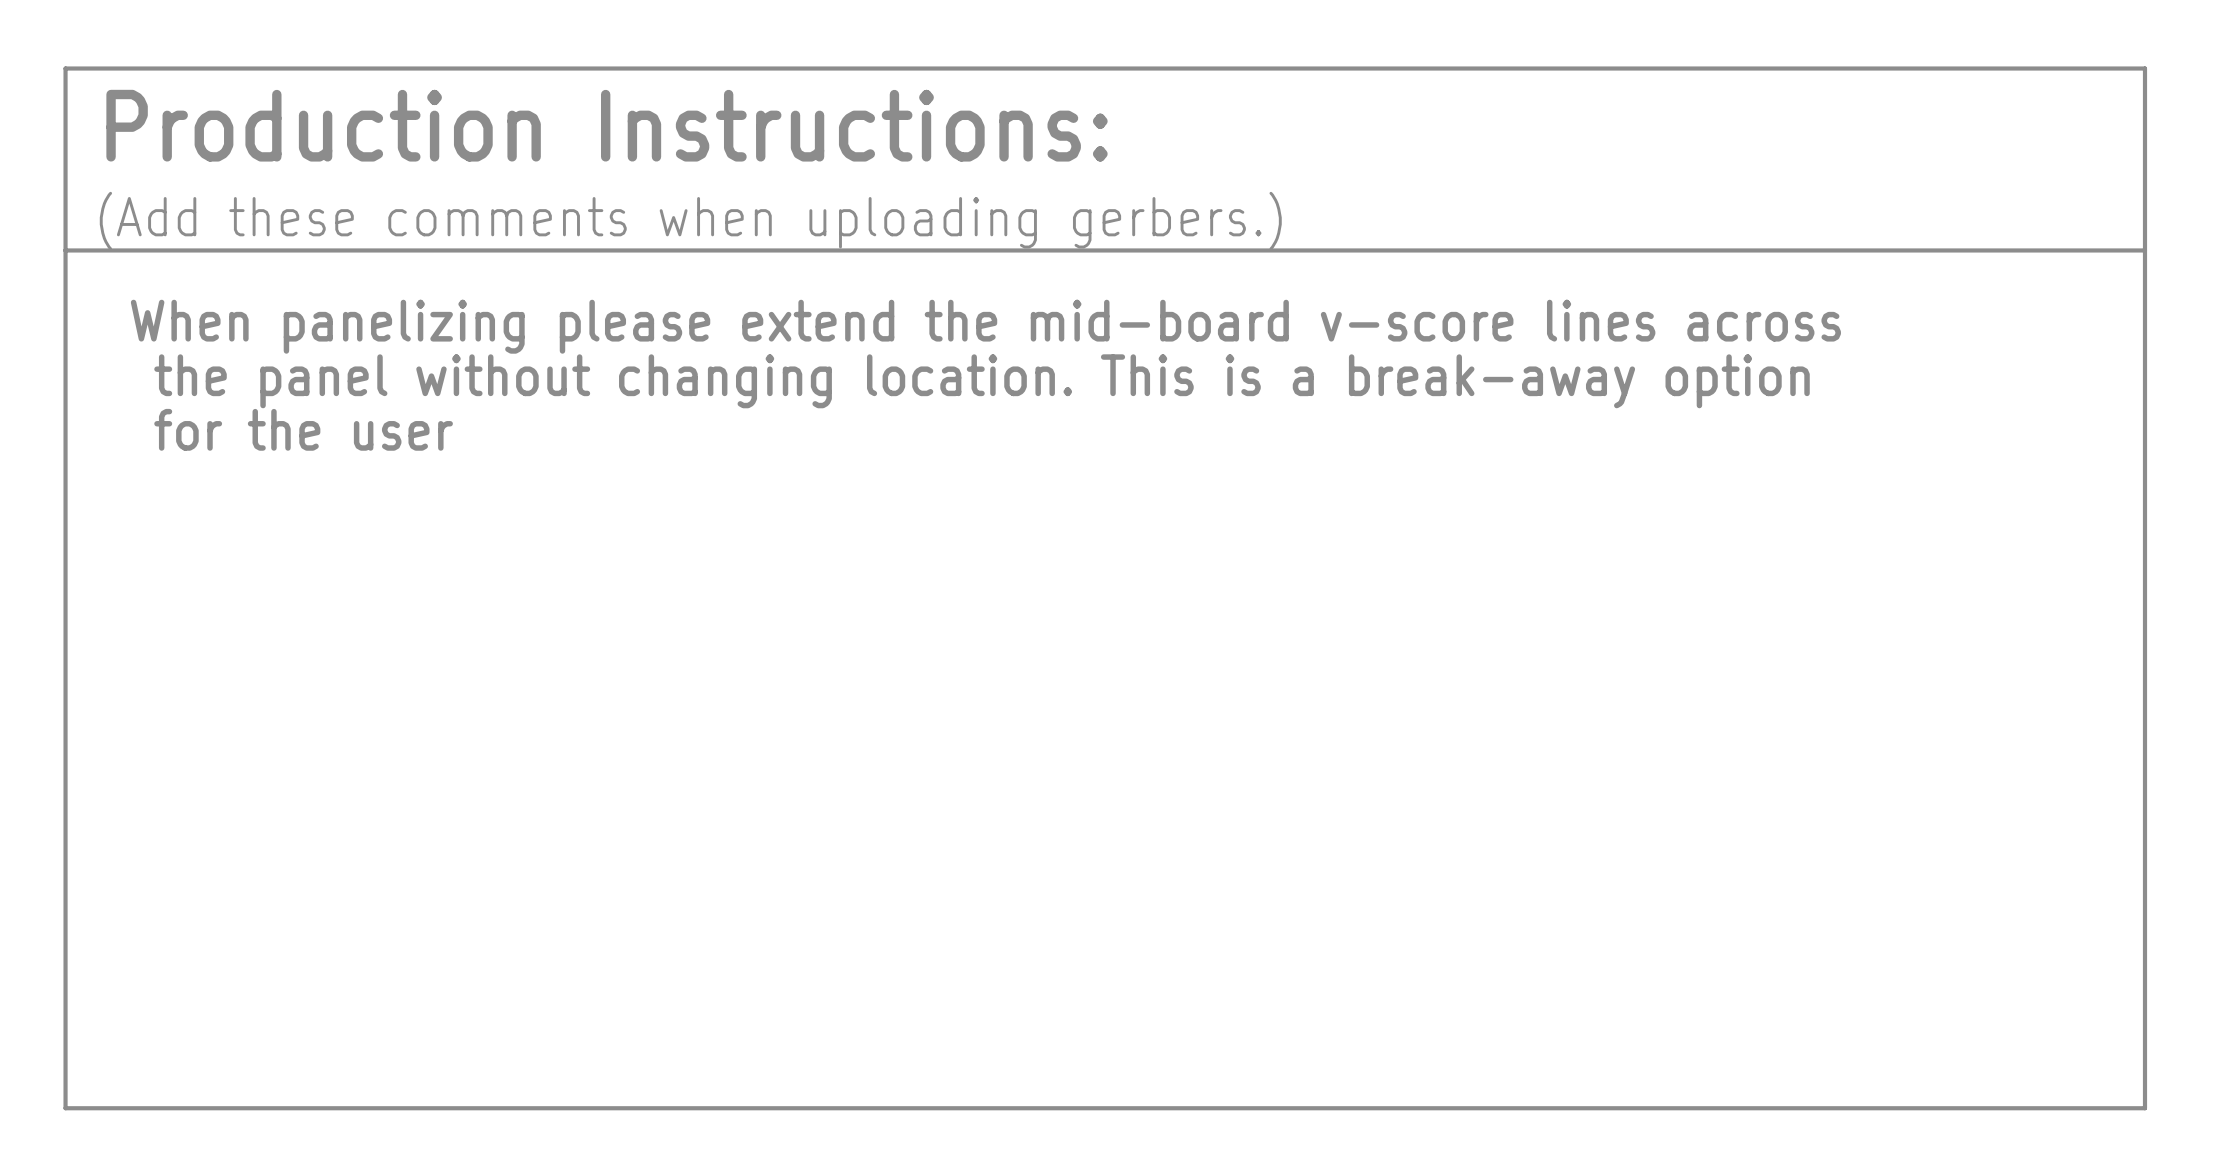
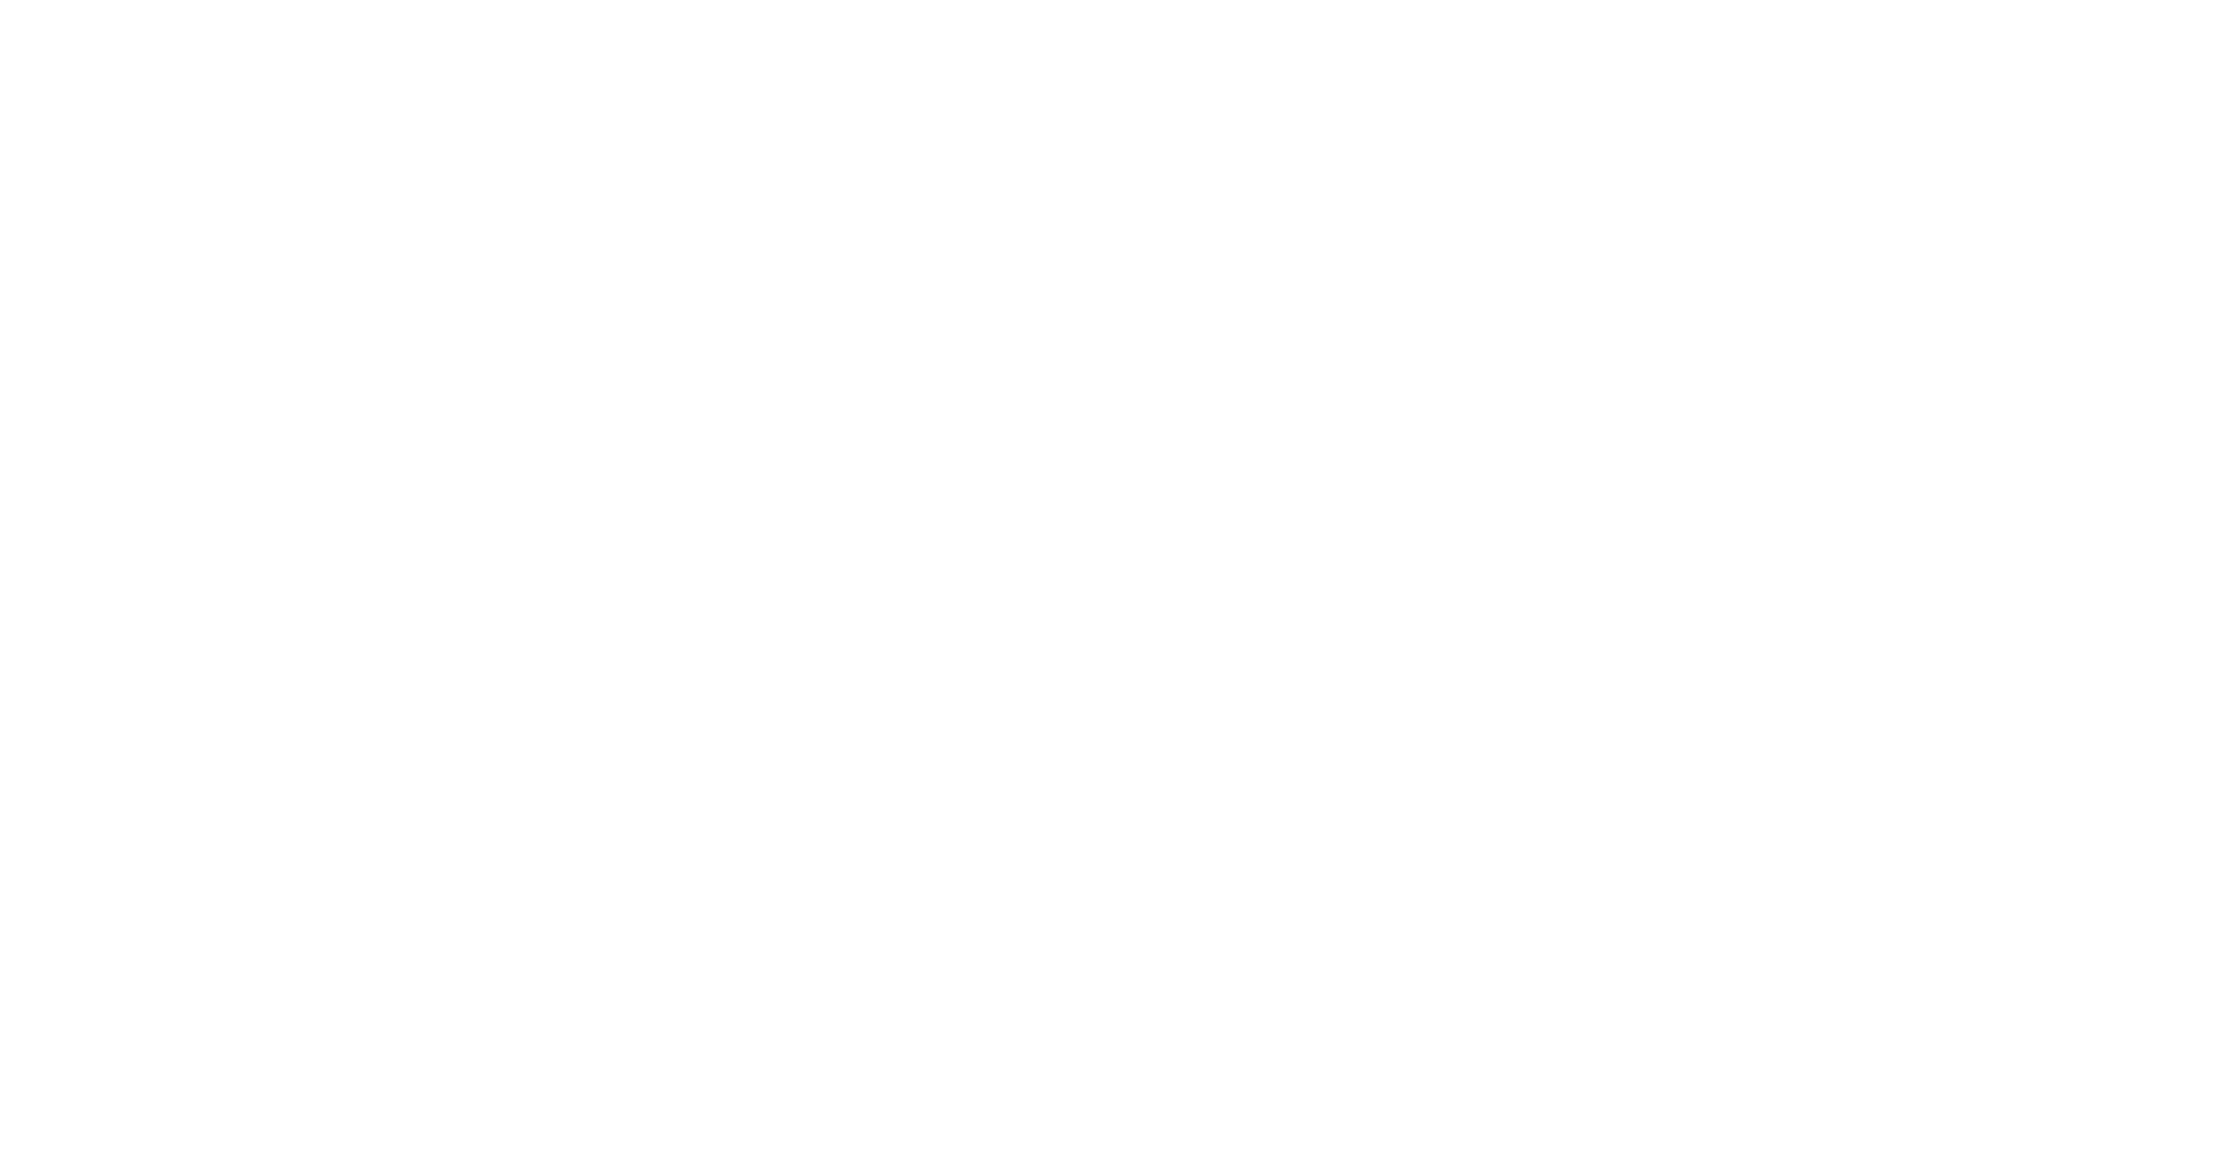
drawing: [63, 66, 2148, 1111] -> none
text: When panelizing please extend the mid-board v-score lines across (985, 326) -> none
text: the panel without changing location. This is a break-away option (982, 381) -> none
text: for the user (303, 429) -> none

